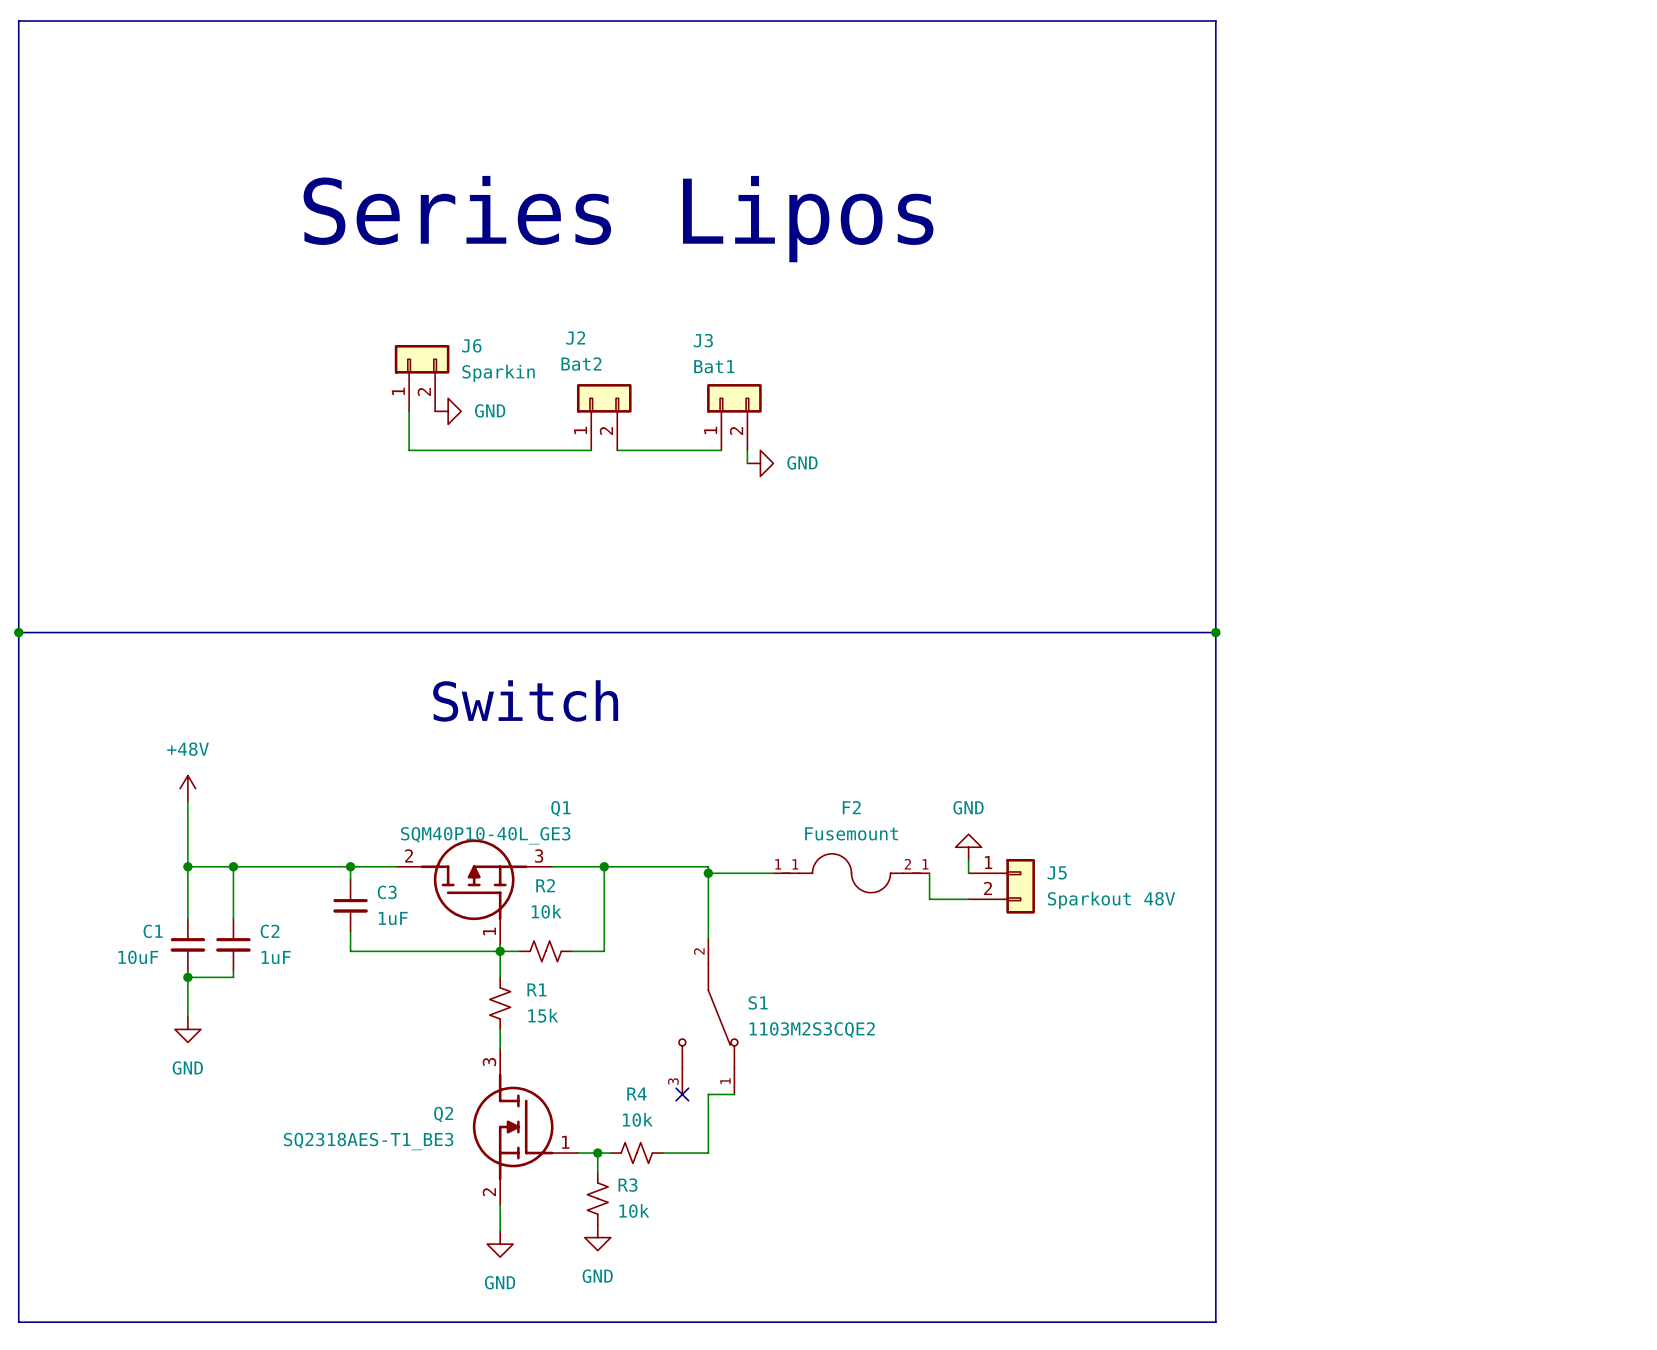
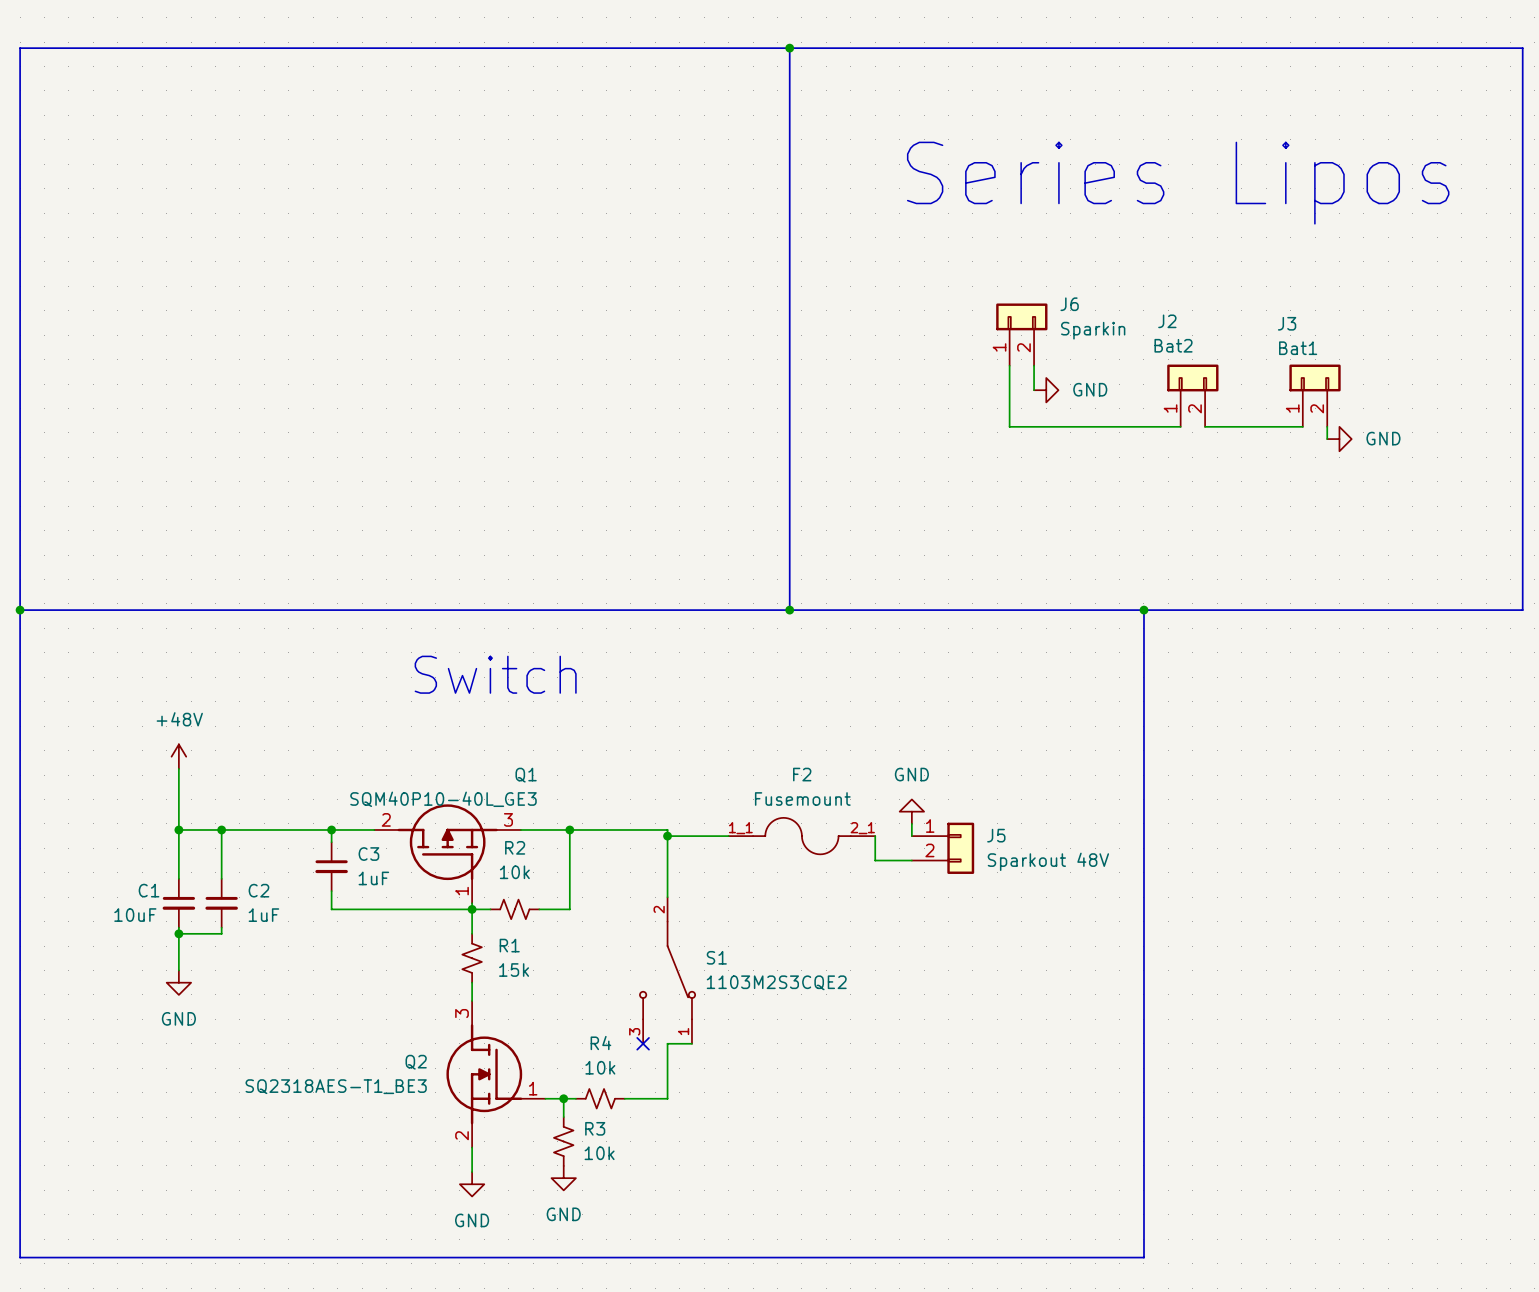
bus: (18, 34) (18, 21) (1215, 21) (1215, 632) -> (20, 48) (1522, 48) (1522, 610) (1143, 610)
bus: none -> (789, 48) (789, 610)
junction: none -> (789, 48)
text: none -> Series Lipos (1178, 183)
text: Series Lipos (618, 219) -> none
wire: none -> (1009, 365) (1009, 426) (1180, 426)
wire: none -> (1034, 365) (1034, 390)
J6 position: (422, 378) -> (1021, 334)
power symbol: none -> GND (1046, 390)
wire: (409, 411) (409, 450) (591, 450) -> none
power symbol: GND (448, 411) -> none
J2 position: (604, 417) -> (1192, 395)
J3 position: (734, 417) -> (1315, 395)
wire: none -> (1205, 426) (1302, 426)
wire: none -> (1327, 426) (1327, 439)
wire: (617, 450) (721, 450) -> none
wire: (747, 450) (747, 463) -> none
power symbol: none -> GND (1339, 439)
power symbol: GND (760, 463) -> none
junction: none -> (789, 610)

